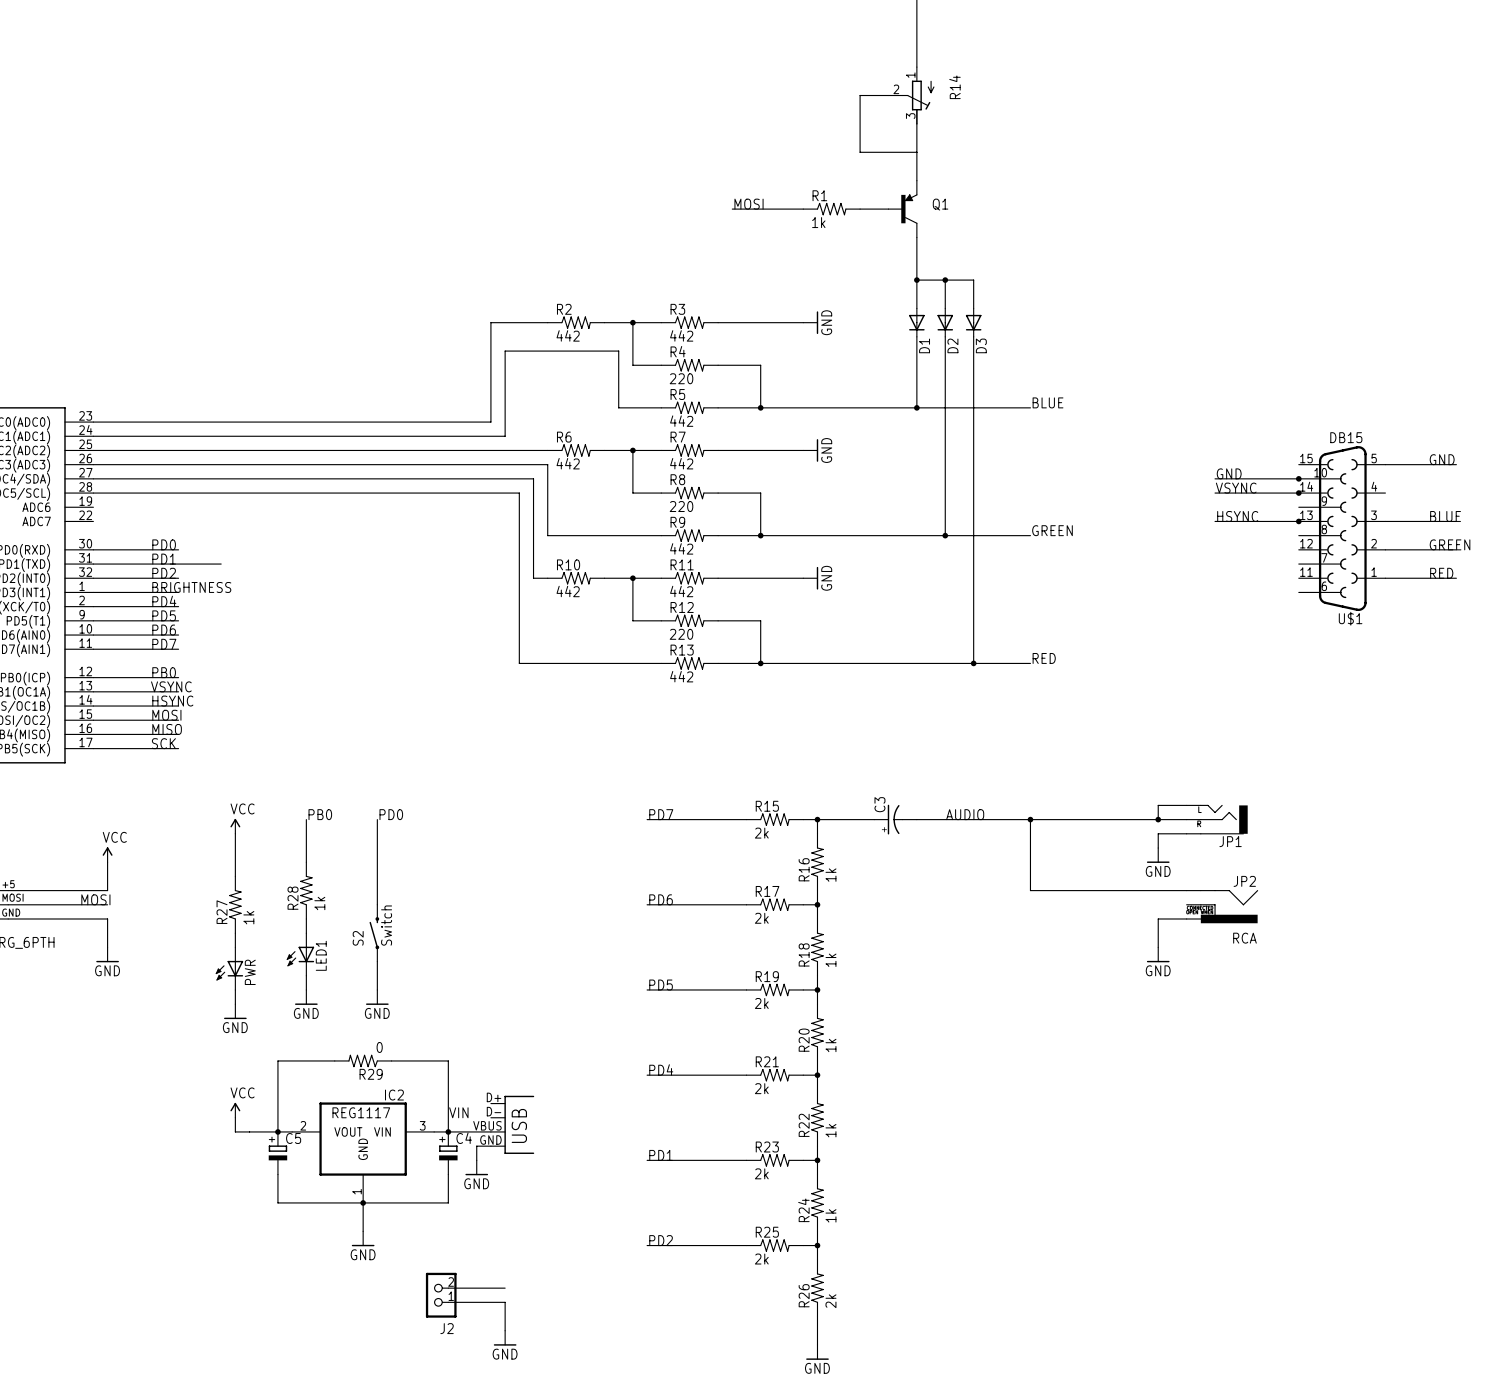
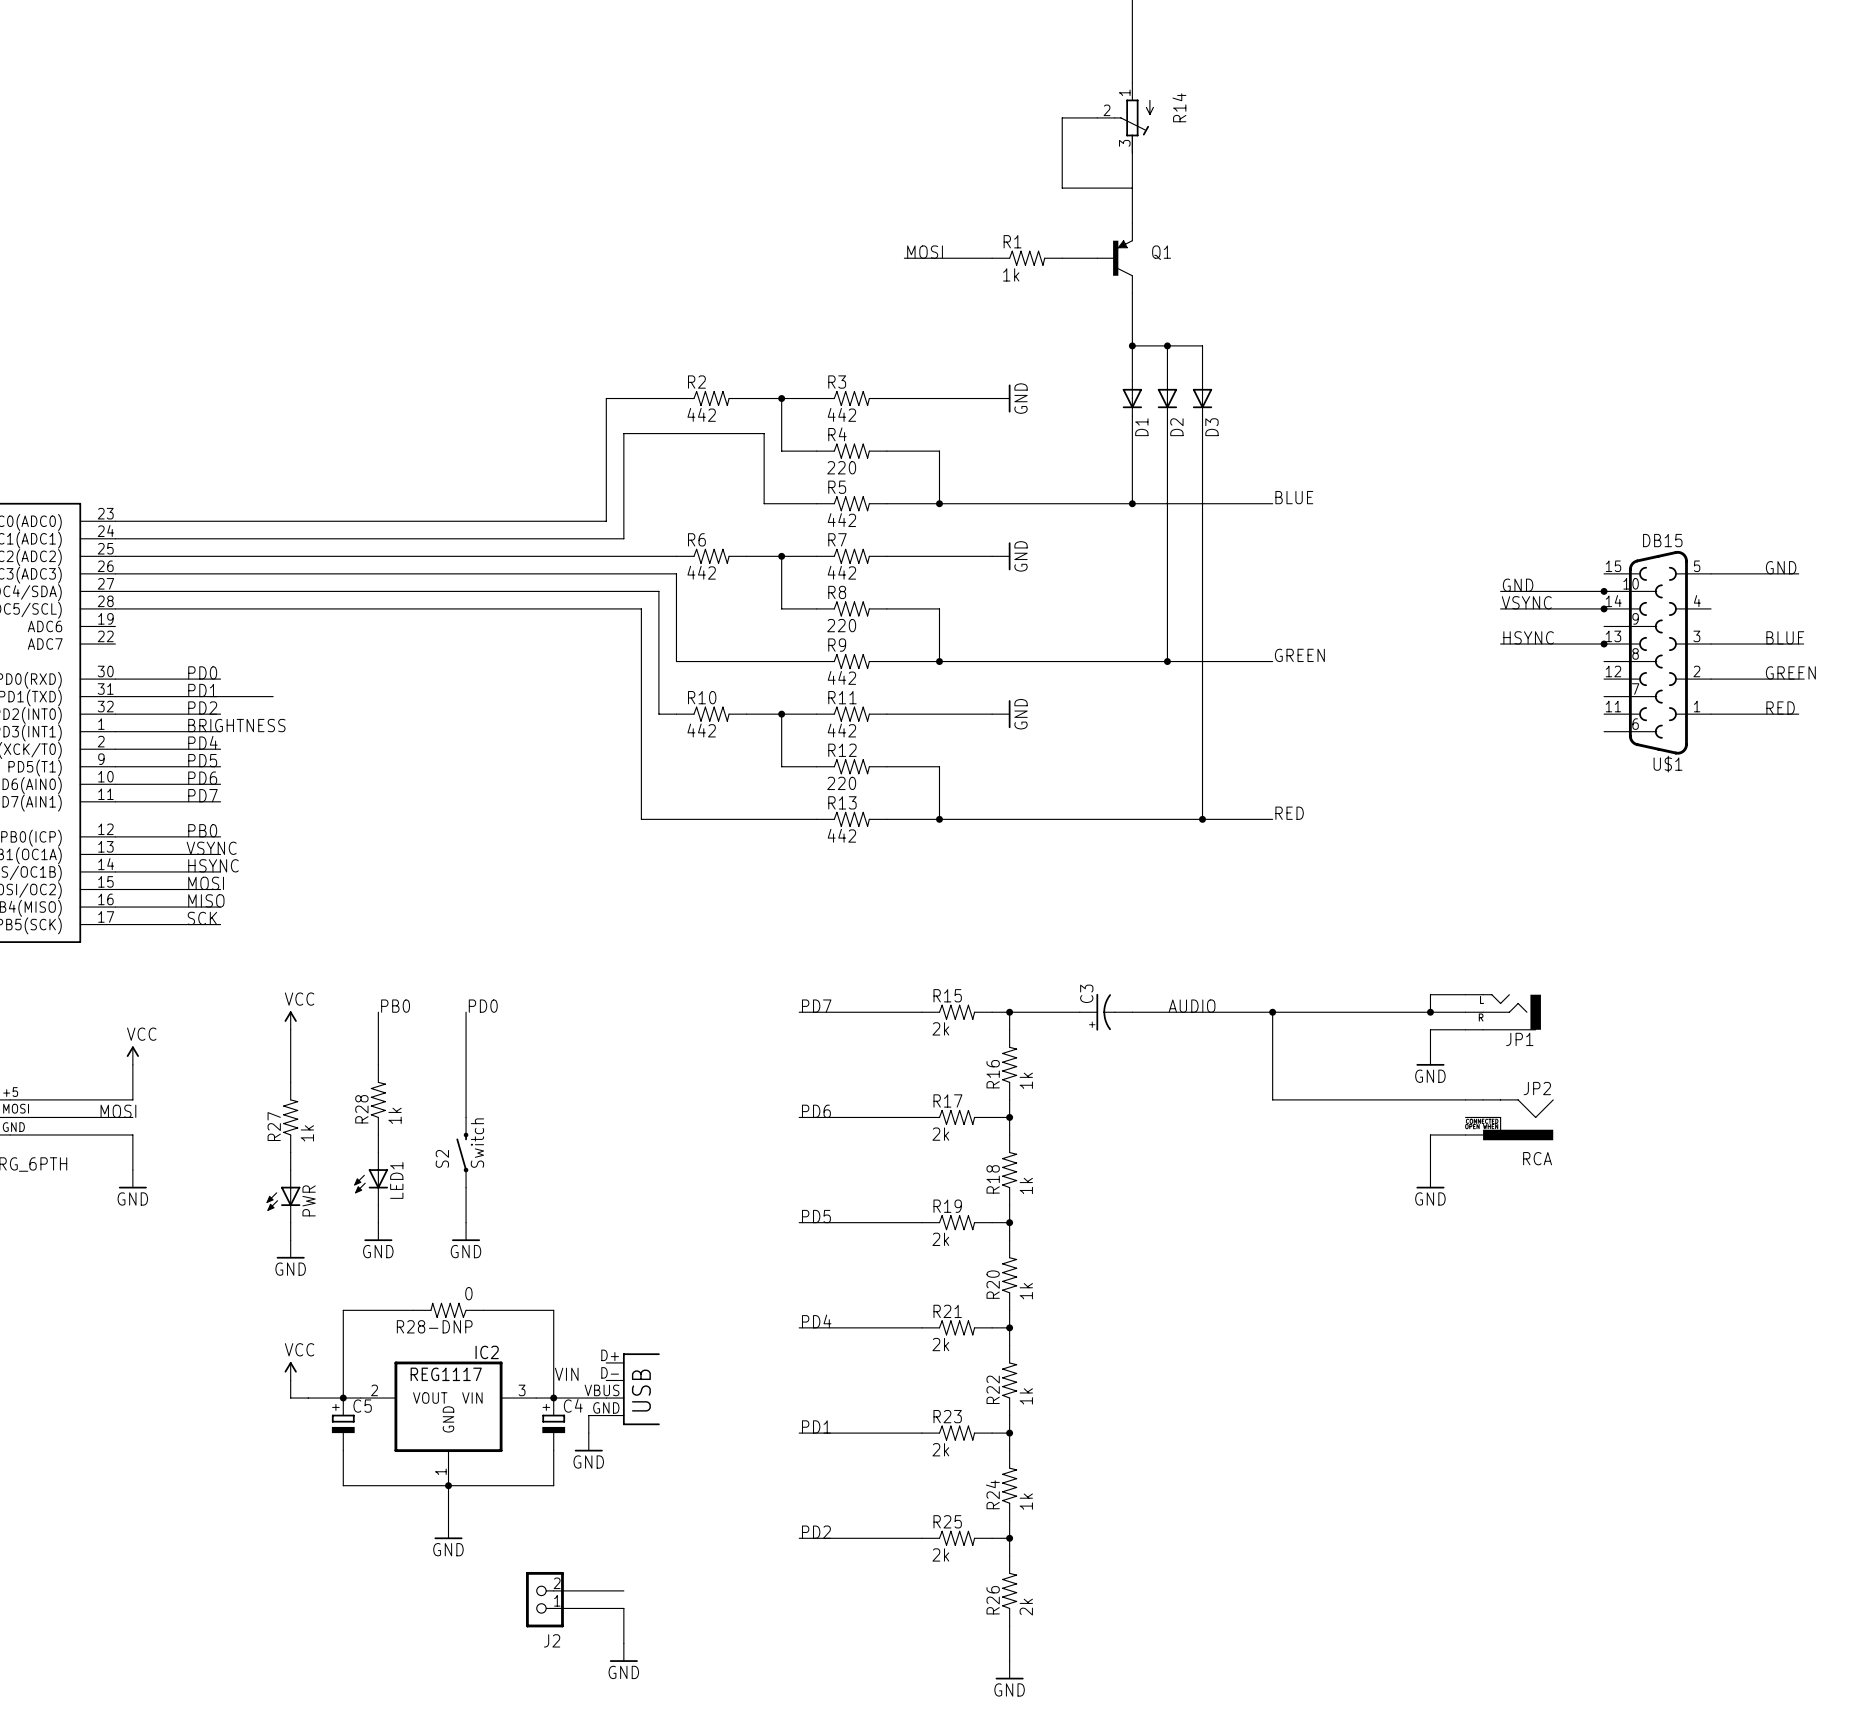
R29 name: R29 (371, 1074) -> R28-DNP (434, 1326)

